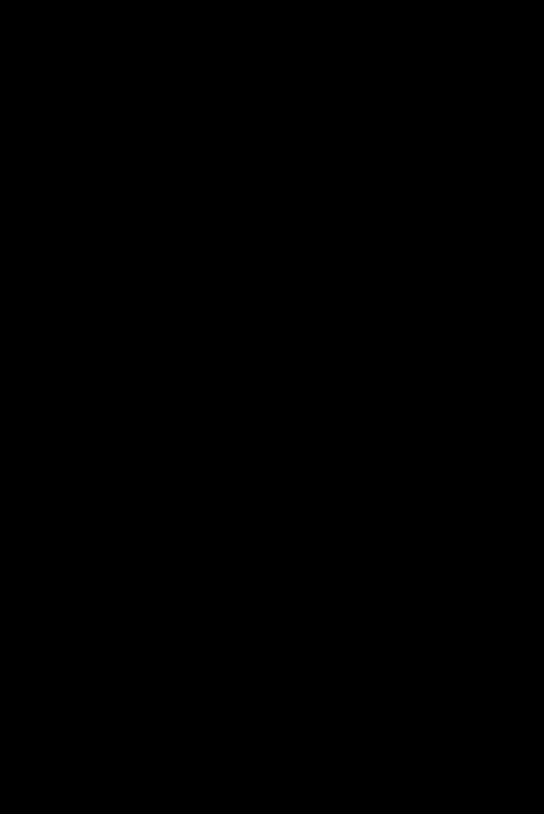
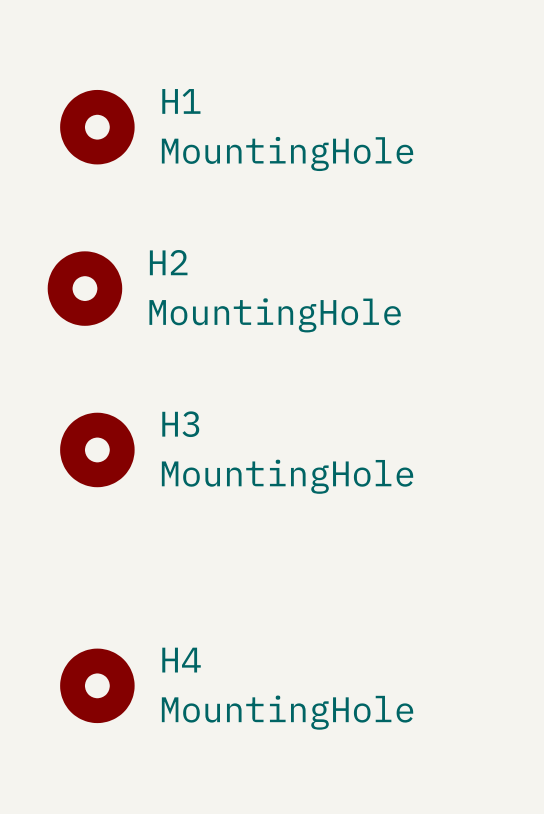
H1: none -> MountingHole (97, 127)
H2: none -> MountingHole (84, 288)
H3: none -> MountingHole (97, 449)
H4: none -> MountingHole (97, 685)

